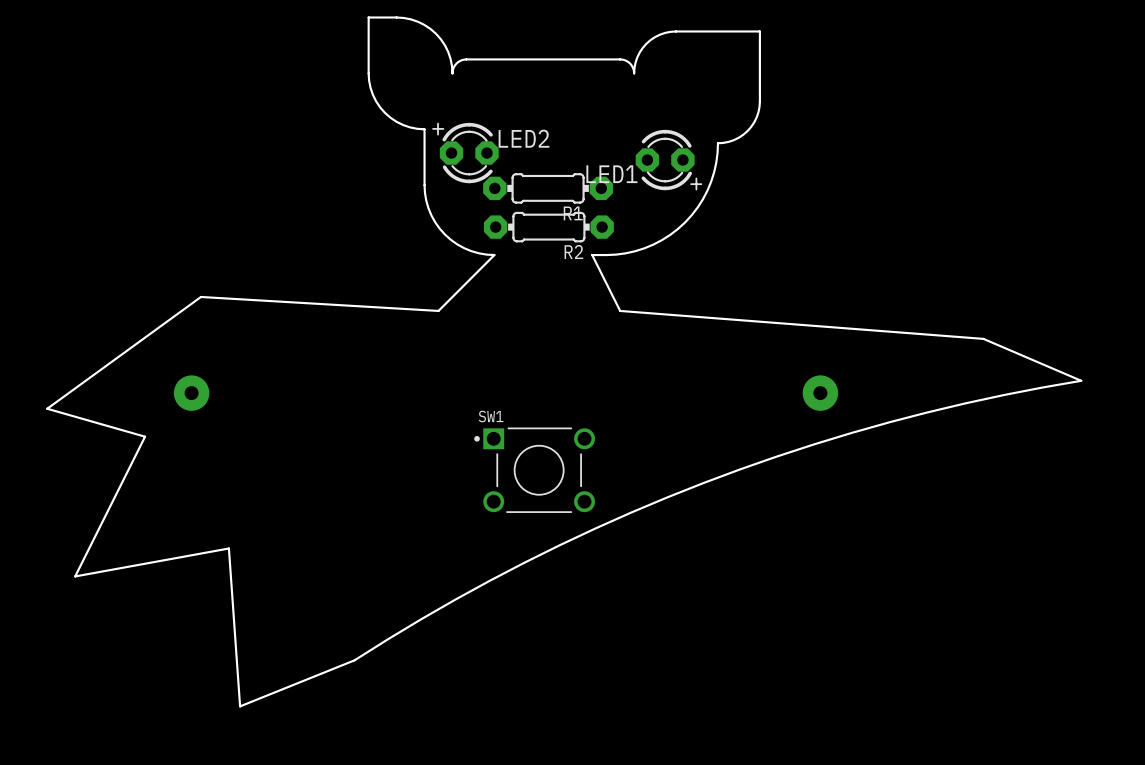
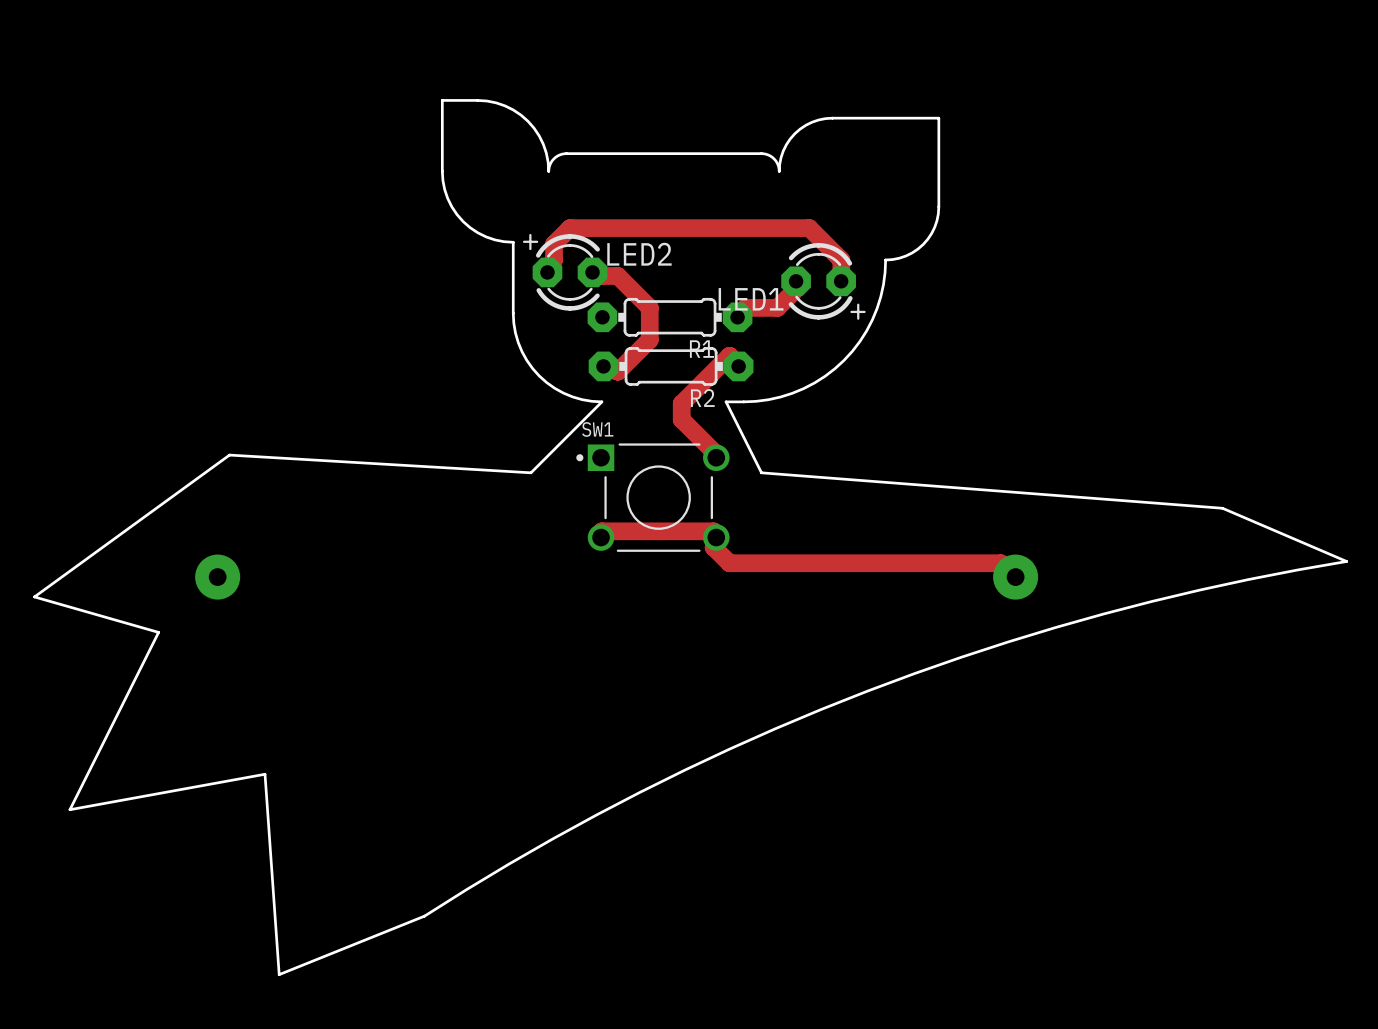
track: none -> (547, 272) (554, 260) (554, 244) (570, 228) (809, 228) (841, 260) (841, 281)
track: none -> (592, 272) (601, 275) (617, 275) (649, 307) (649, 339) (617, 371) (603, 366)
track: none -> (796, 281) (793, 291) (777, 307) (745, 307) (737, 317)
track: none -> (738, 366) (729, 355) (681, 403) (681, 419) (713, 451) (716, 457)
track: none -> (601, 537) (601, 531) (713, 531) (716, 537) (713, 547) (729, 563) (1000, 563) (1015, 577)
SW1 position: (534, 470) -> (652, 497)

